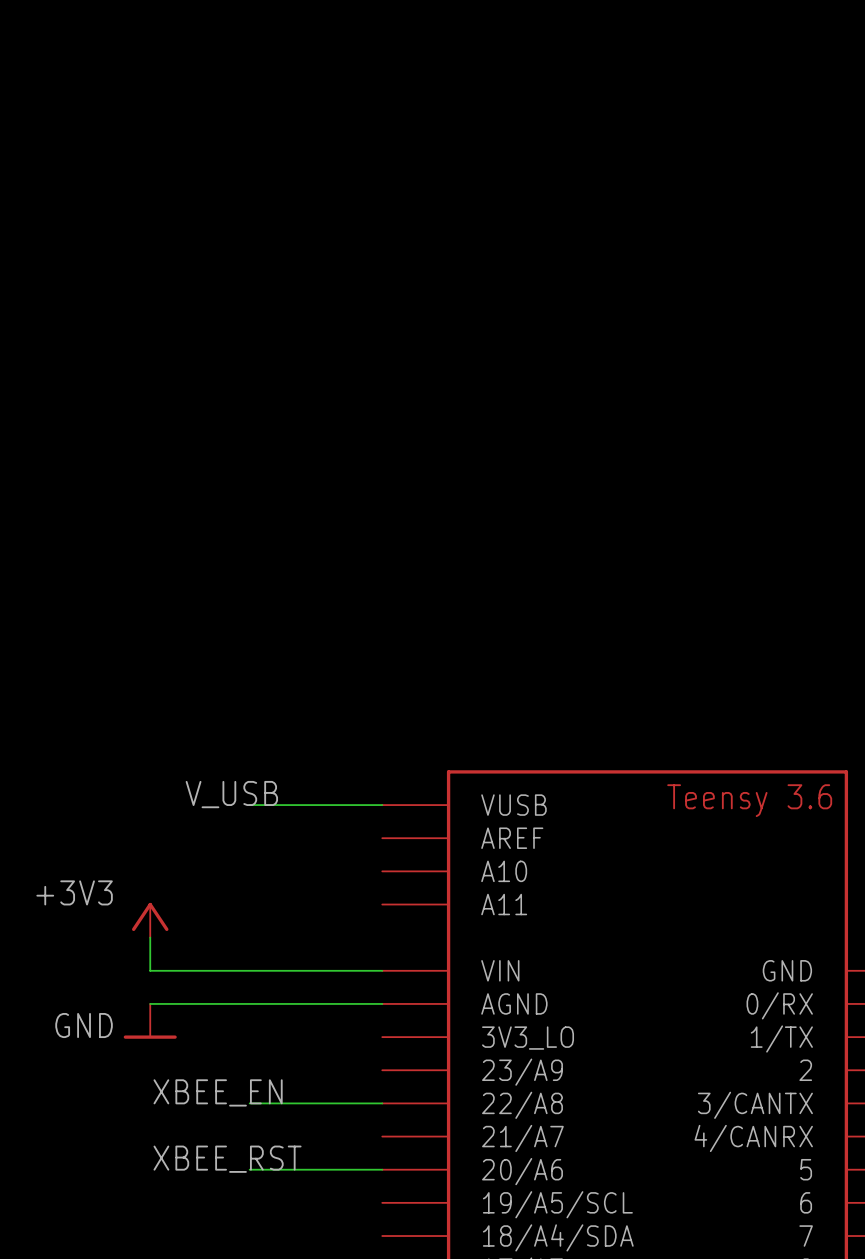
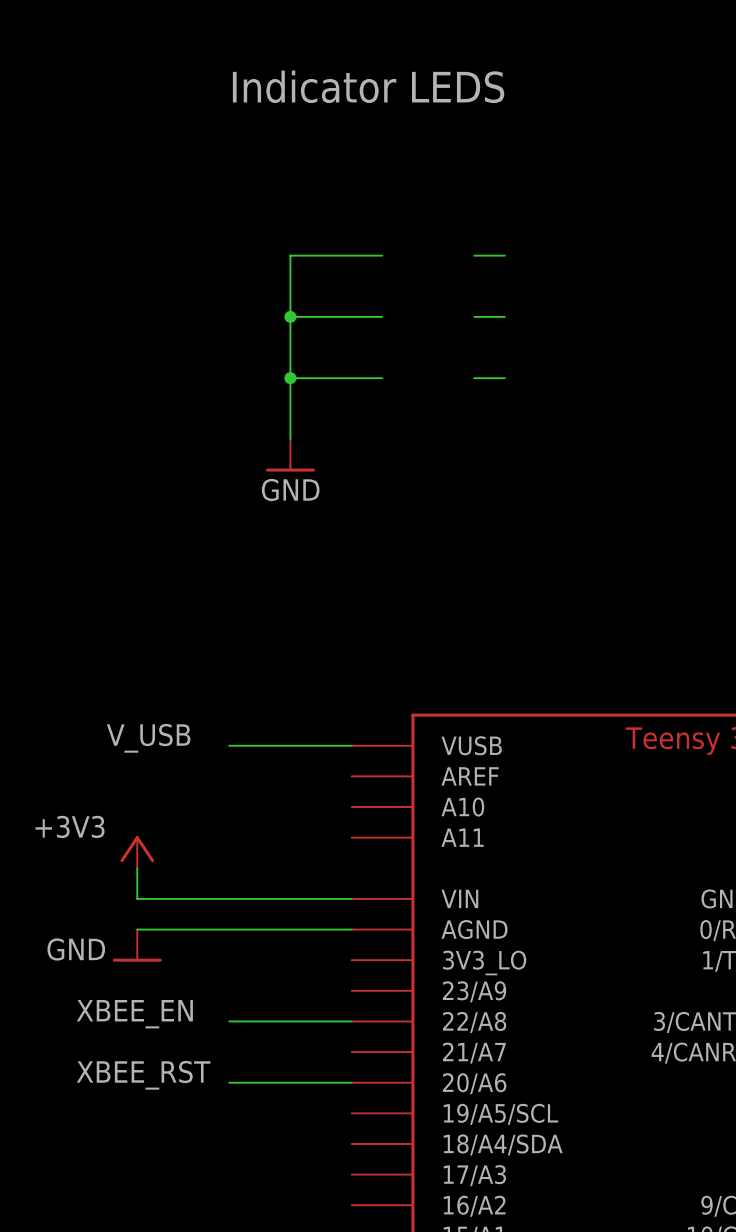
text: none -> Indicator LEDS (368, 86)
wire: none -> (382, 255) (290, 255) (290, 439)
wire: none -> (474, 255) (504, 255)
wire: none -> (290, 316) (382, 316)
junction: none -> (290, 316)
wire: none -> (474, 316) (504, 316)
wire: none -> (290, 378) (382, 378)
junction: none -> (290, 378)
wire: none -> (474, 378) (504, 378)
power symbol: none -> GND (290, 455)
label position: V_USB (231, 794) -> V_USB (148, 738)
label position: XBEE_EN (218, 1092) -> XBEE_EN (134, 1014)
label position: XBEE_RST (227, 1159) -> XBEE_RST (143, 1075)

